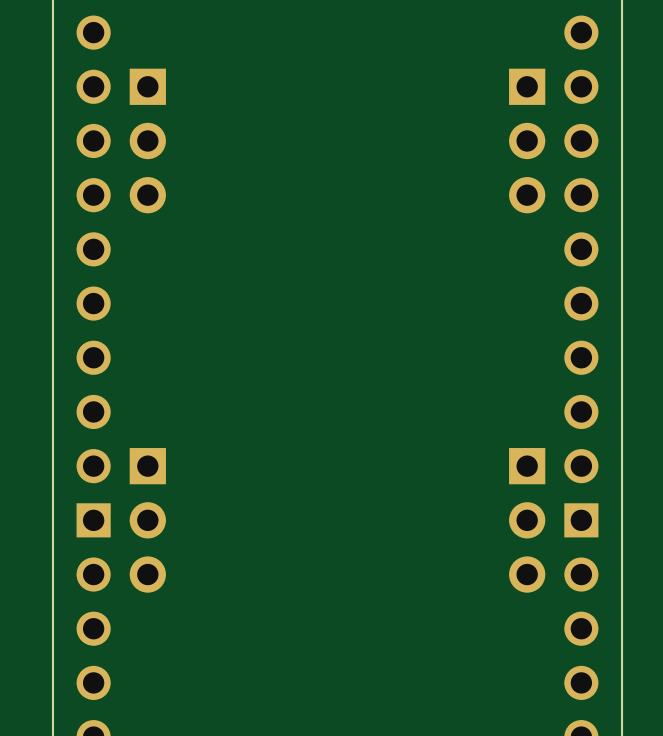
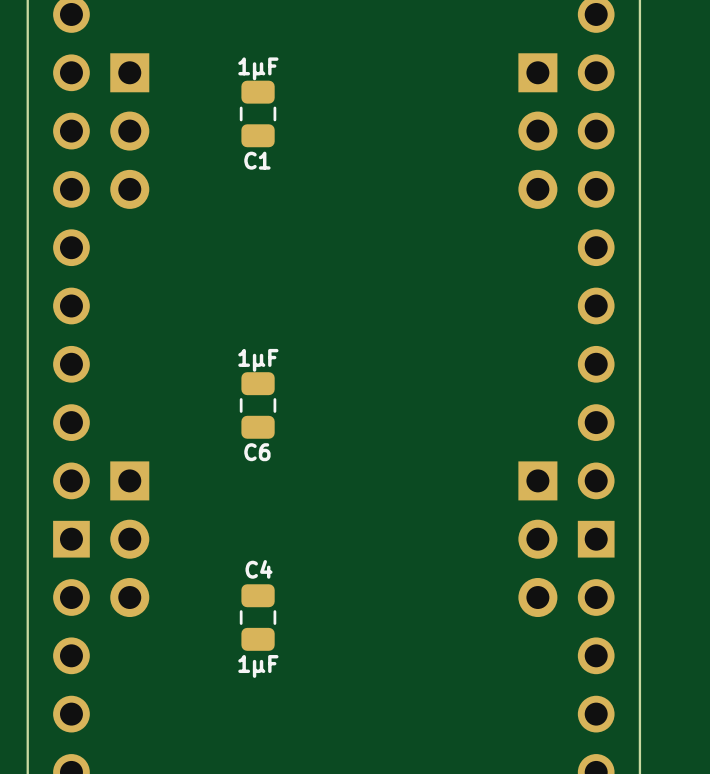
C1: none -> 1μF (258, 113)
C6: none -> 1μF (258, 405)
C4: none -> 1μF (258, 617)

